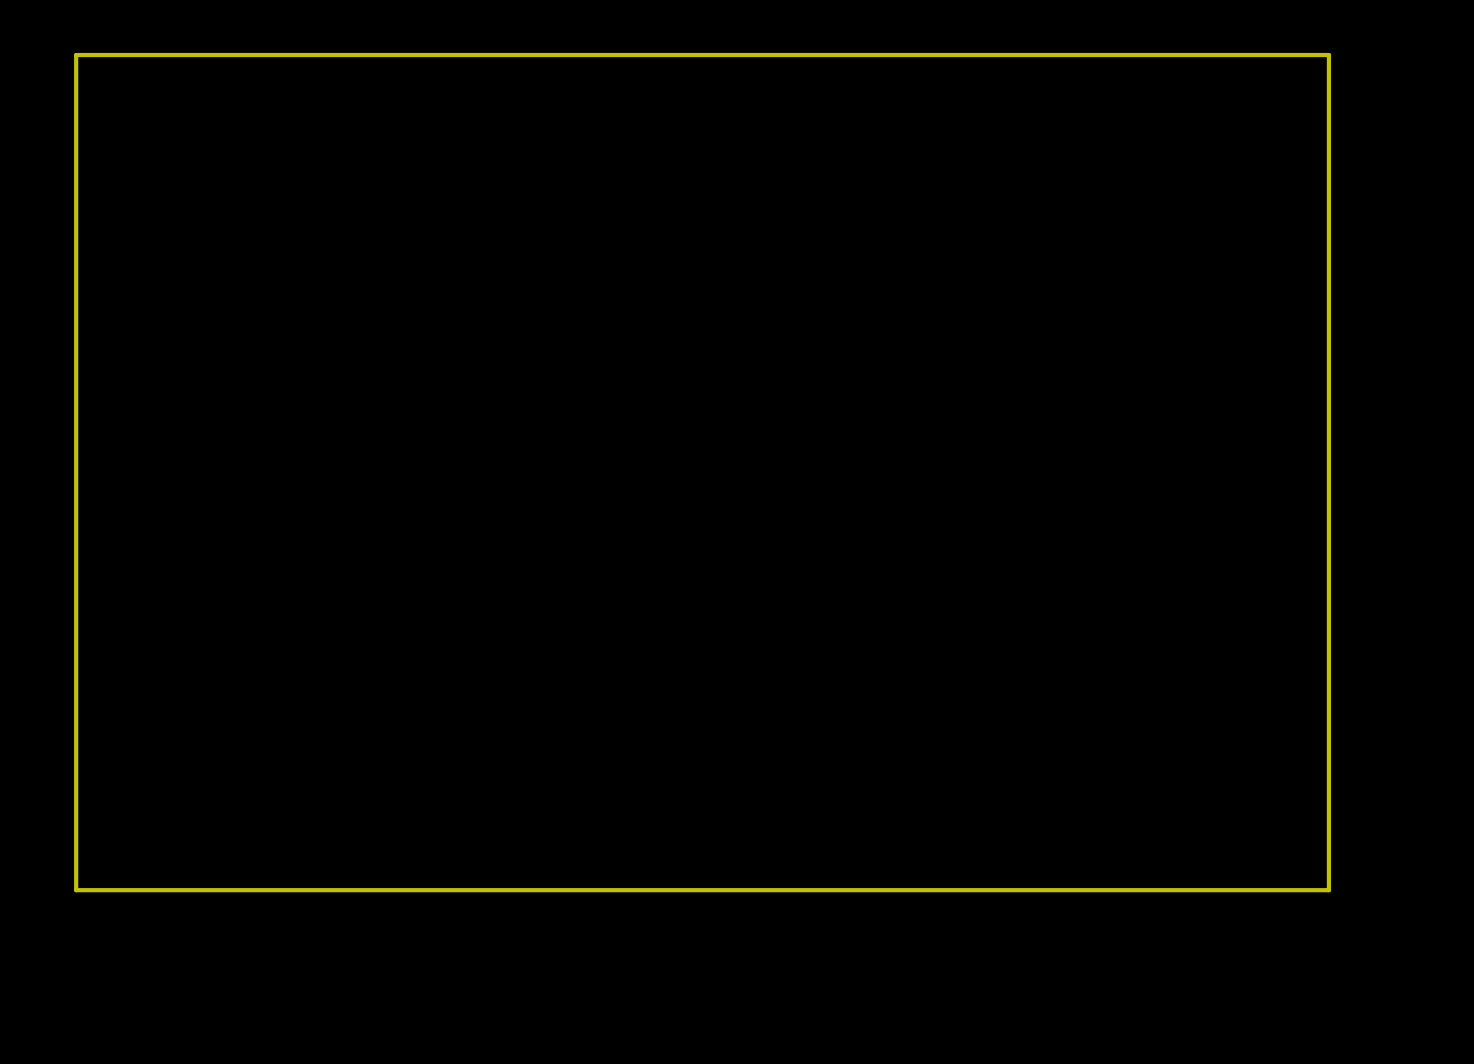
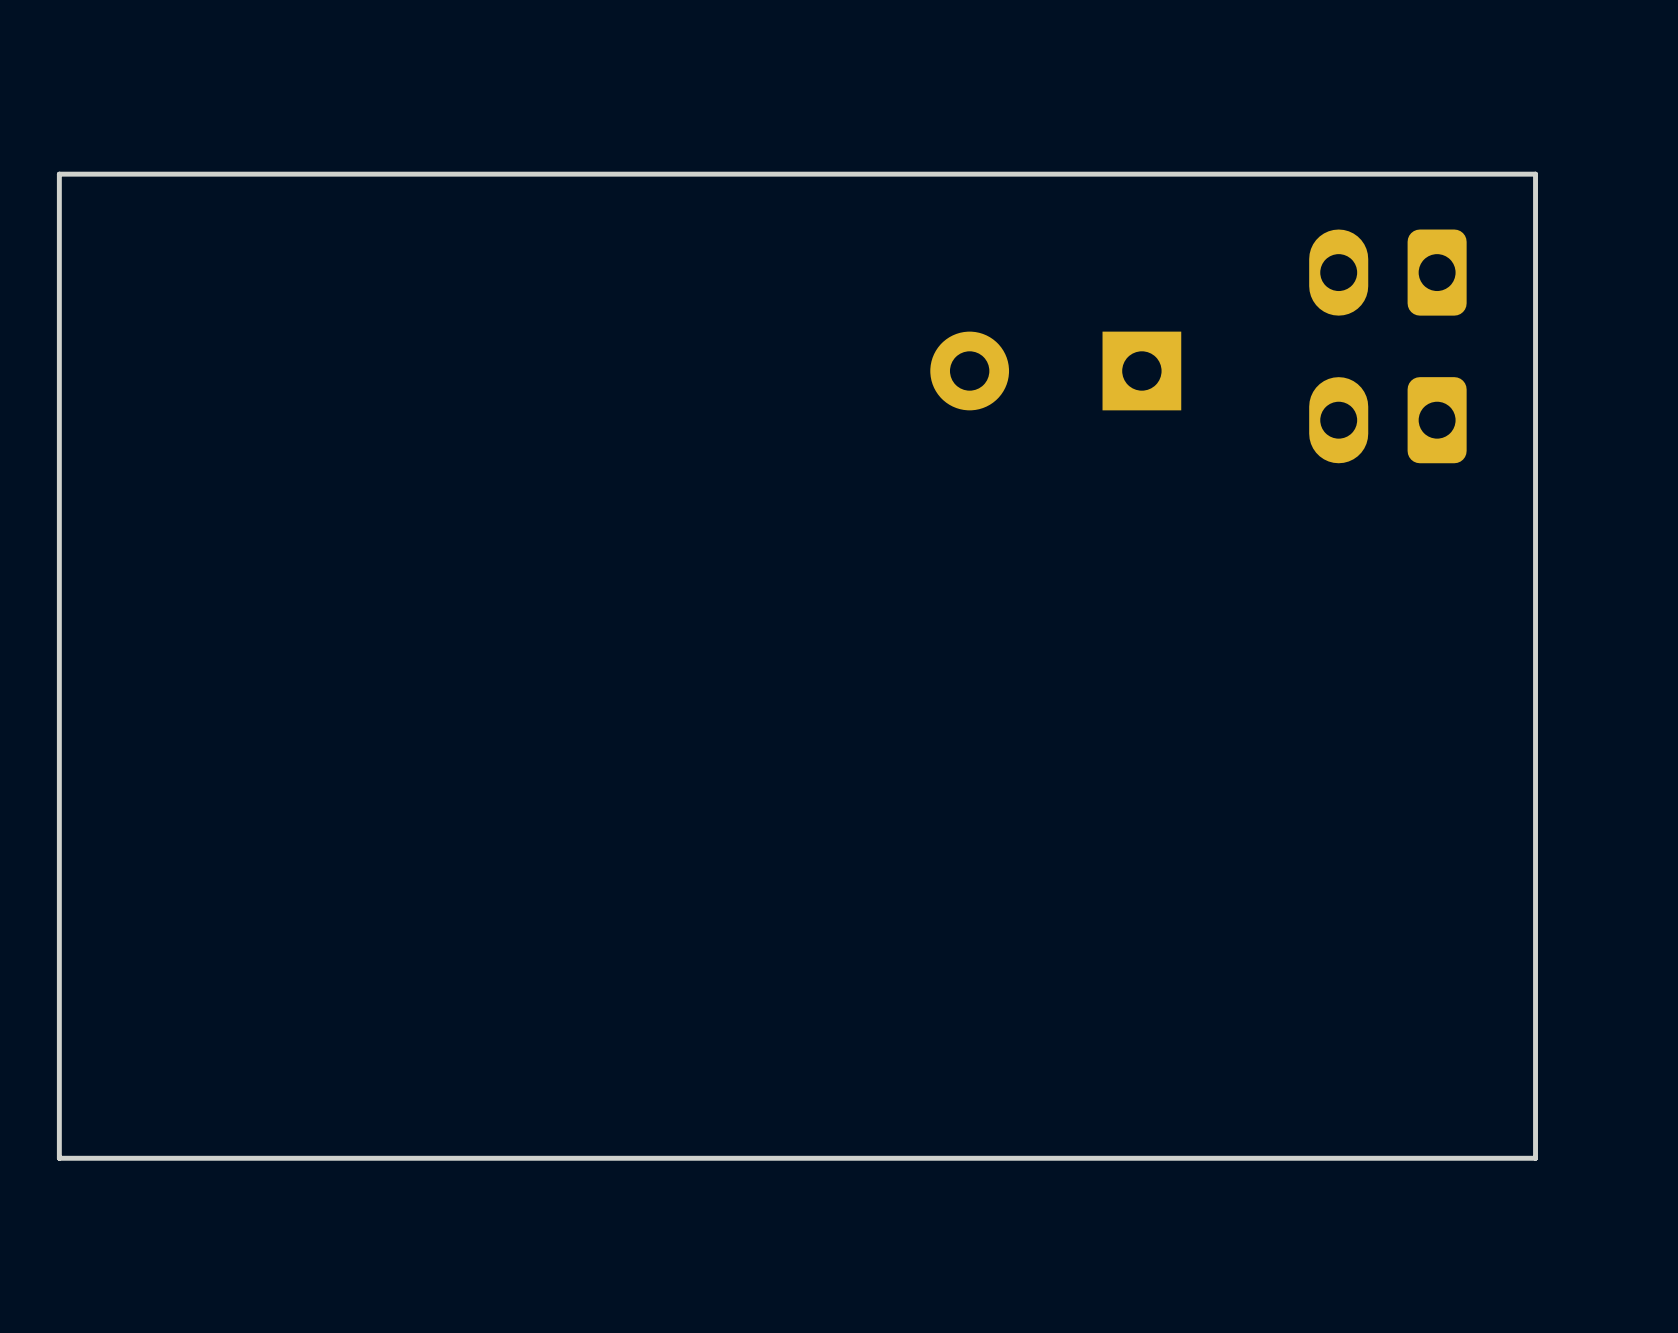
part: none -> (1387, 272)
part: none -> (1055, 370)
part: none -> (1387, 420)

